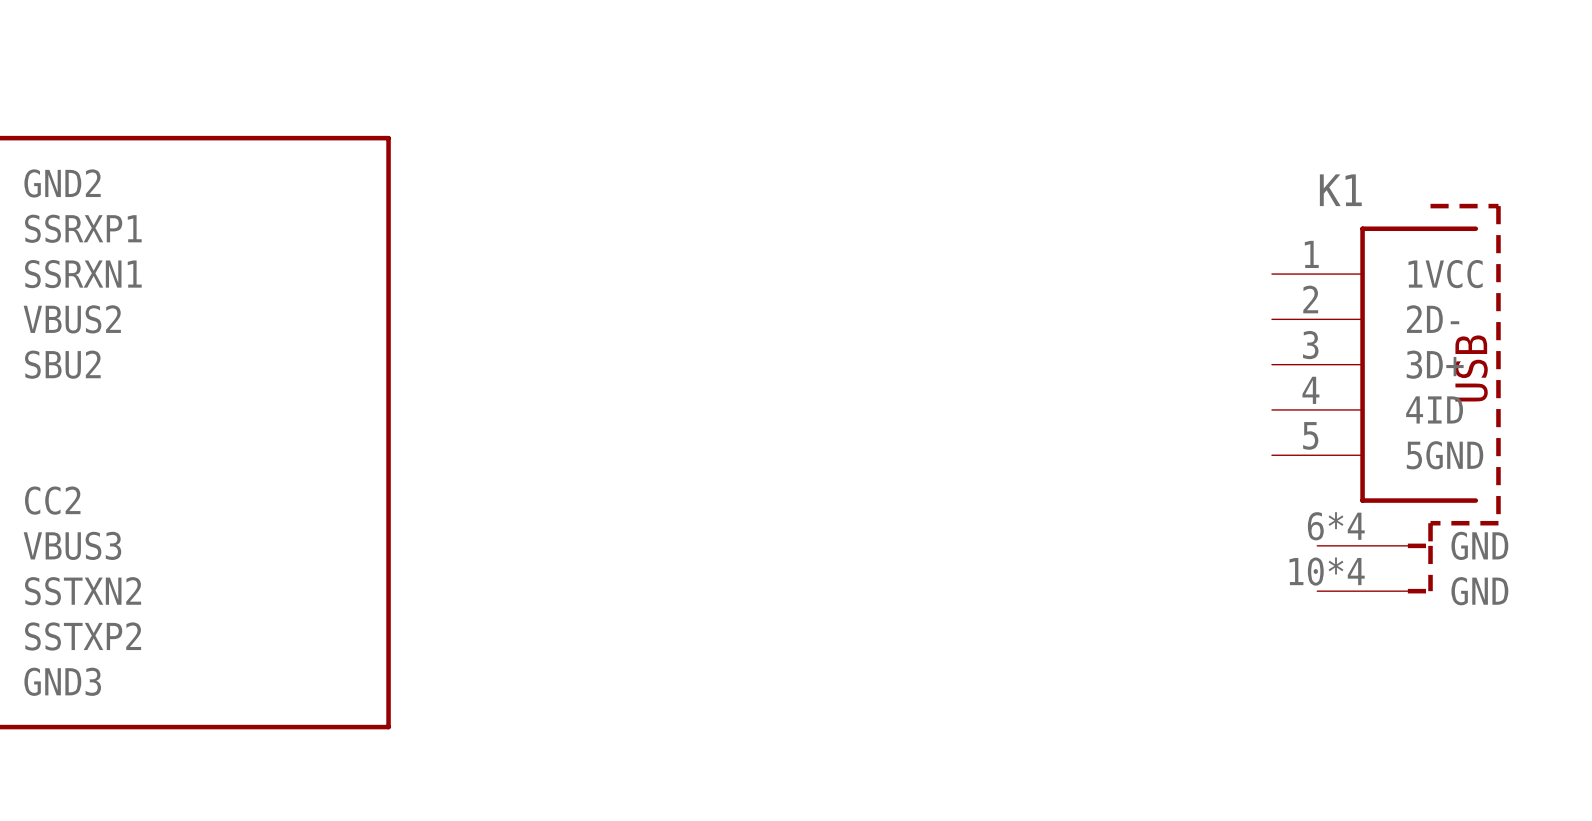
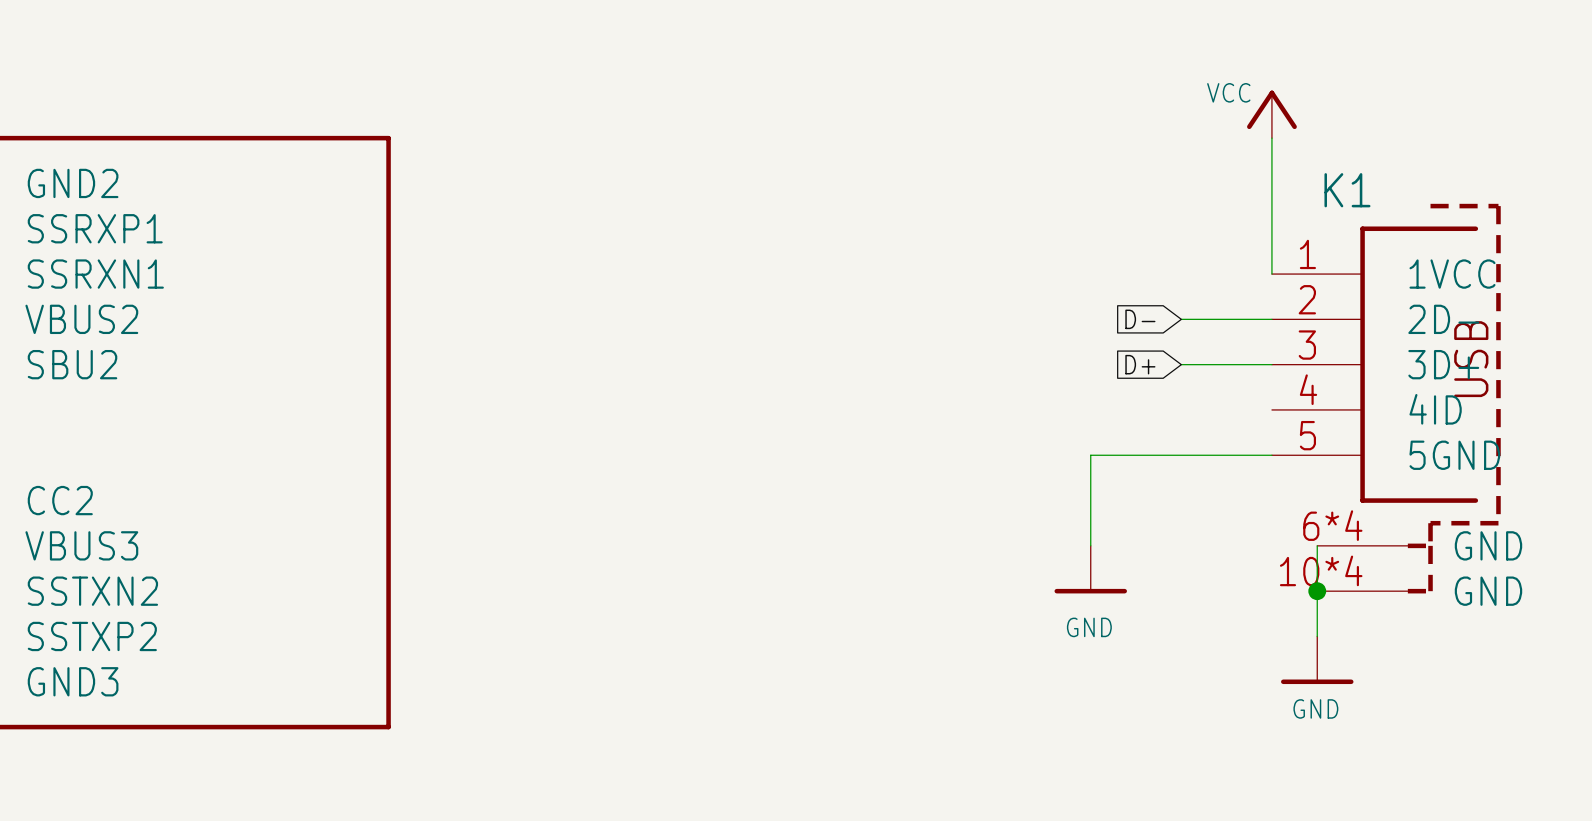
power symbol: none -> VCC (1271, 114)
wire: none -> (1271, 138) (1271, 274)
global label: none -> D- (1140, 319)
wire: none -> (1181, 319) (1271, 319)
global label: none -> D+ (1140, 364)
wire: none -> (1181, 364) (1271, 364)
wire: none -> (1271, 455) (1090, 455) (1090, 545)
wire: none -> (1317, 545) (1317, 636)
power symbol: none -> GND (1090, 569)
junction: none -> (1317, 591)
power symbol: none -> GND (1317, 660)

